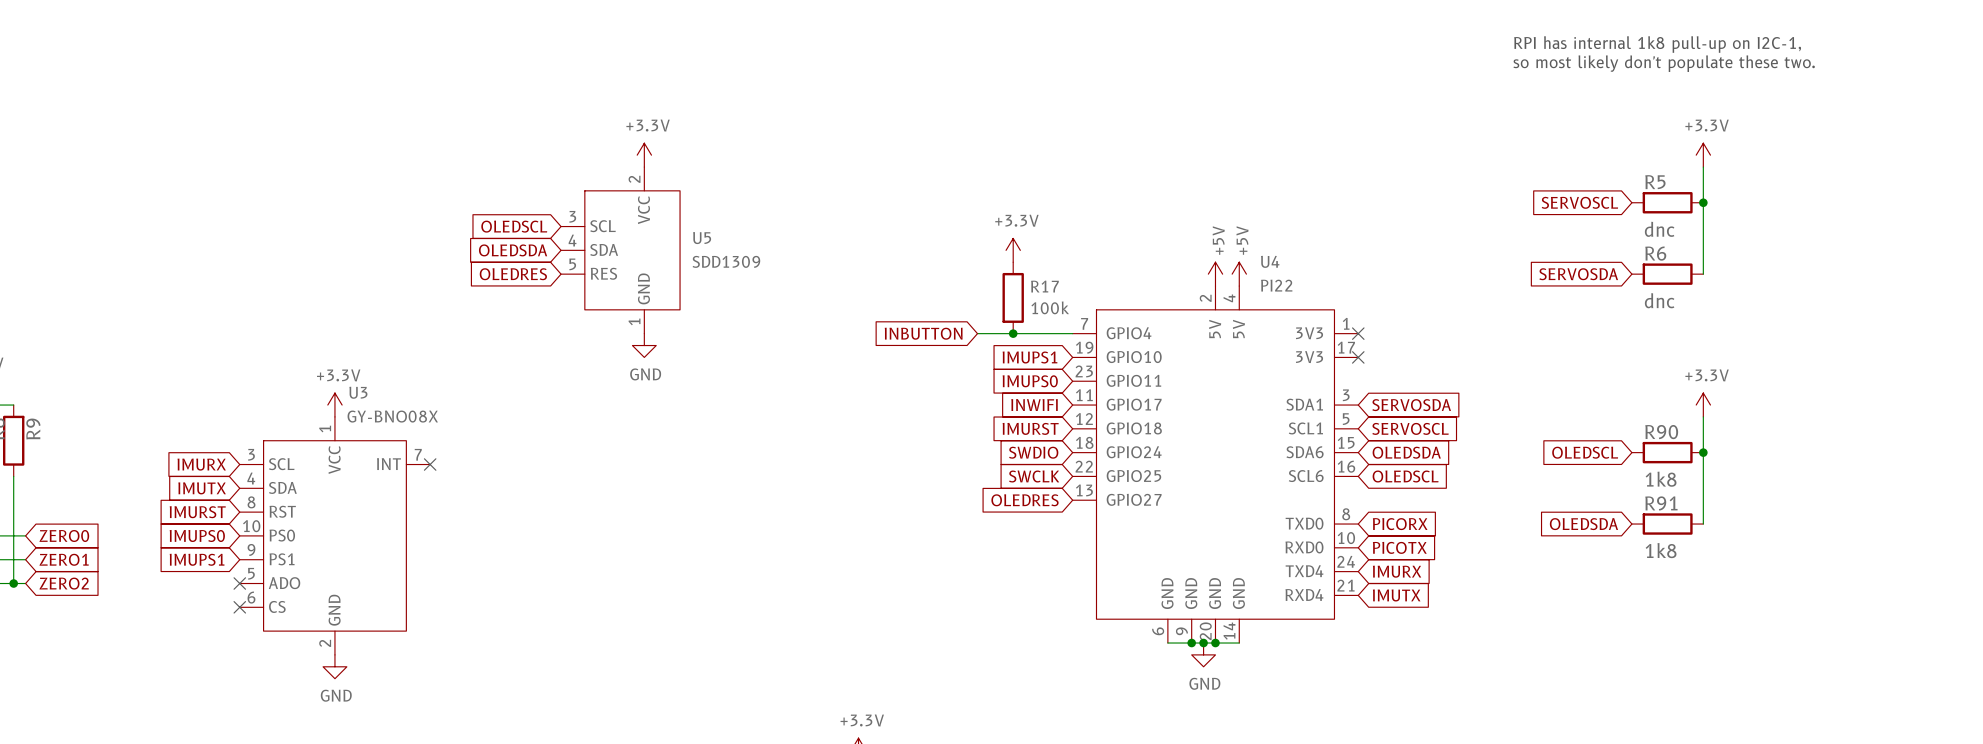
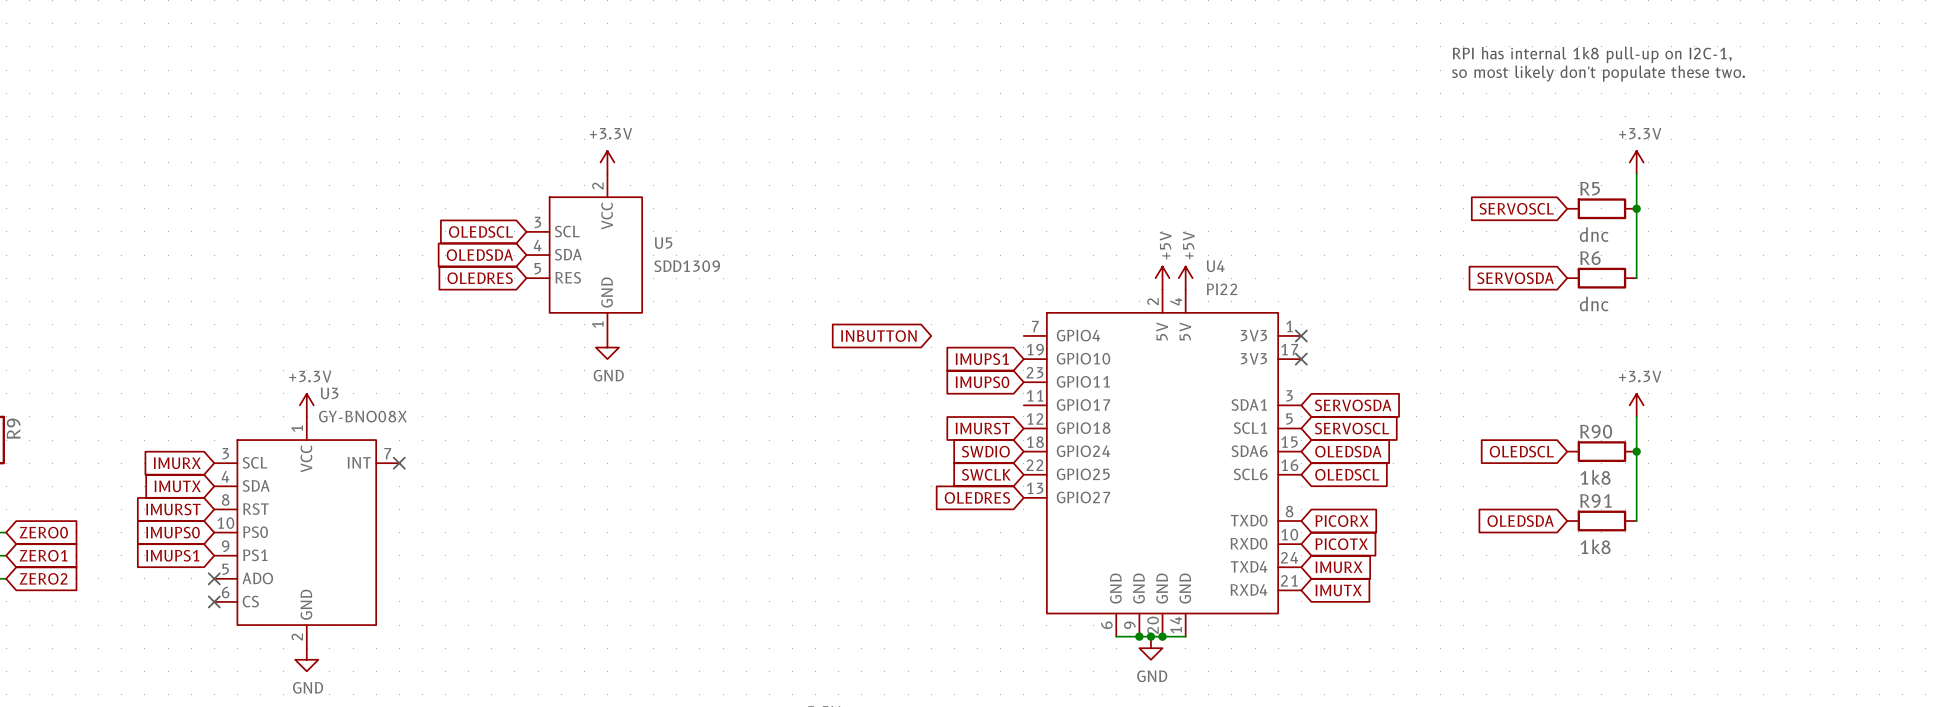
power symbol: +3.3V (1013, 250) -> none
R17: 100k (1013, 297) -> none
wire: (977, 333) (1072, 333) -> none
junction: (1013, 333) -> none
global label: INWIFI (1034, 405) -> none

